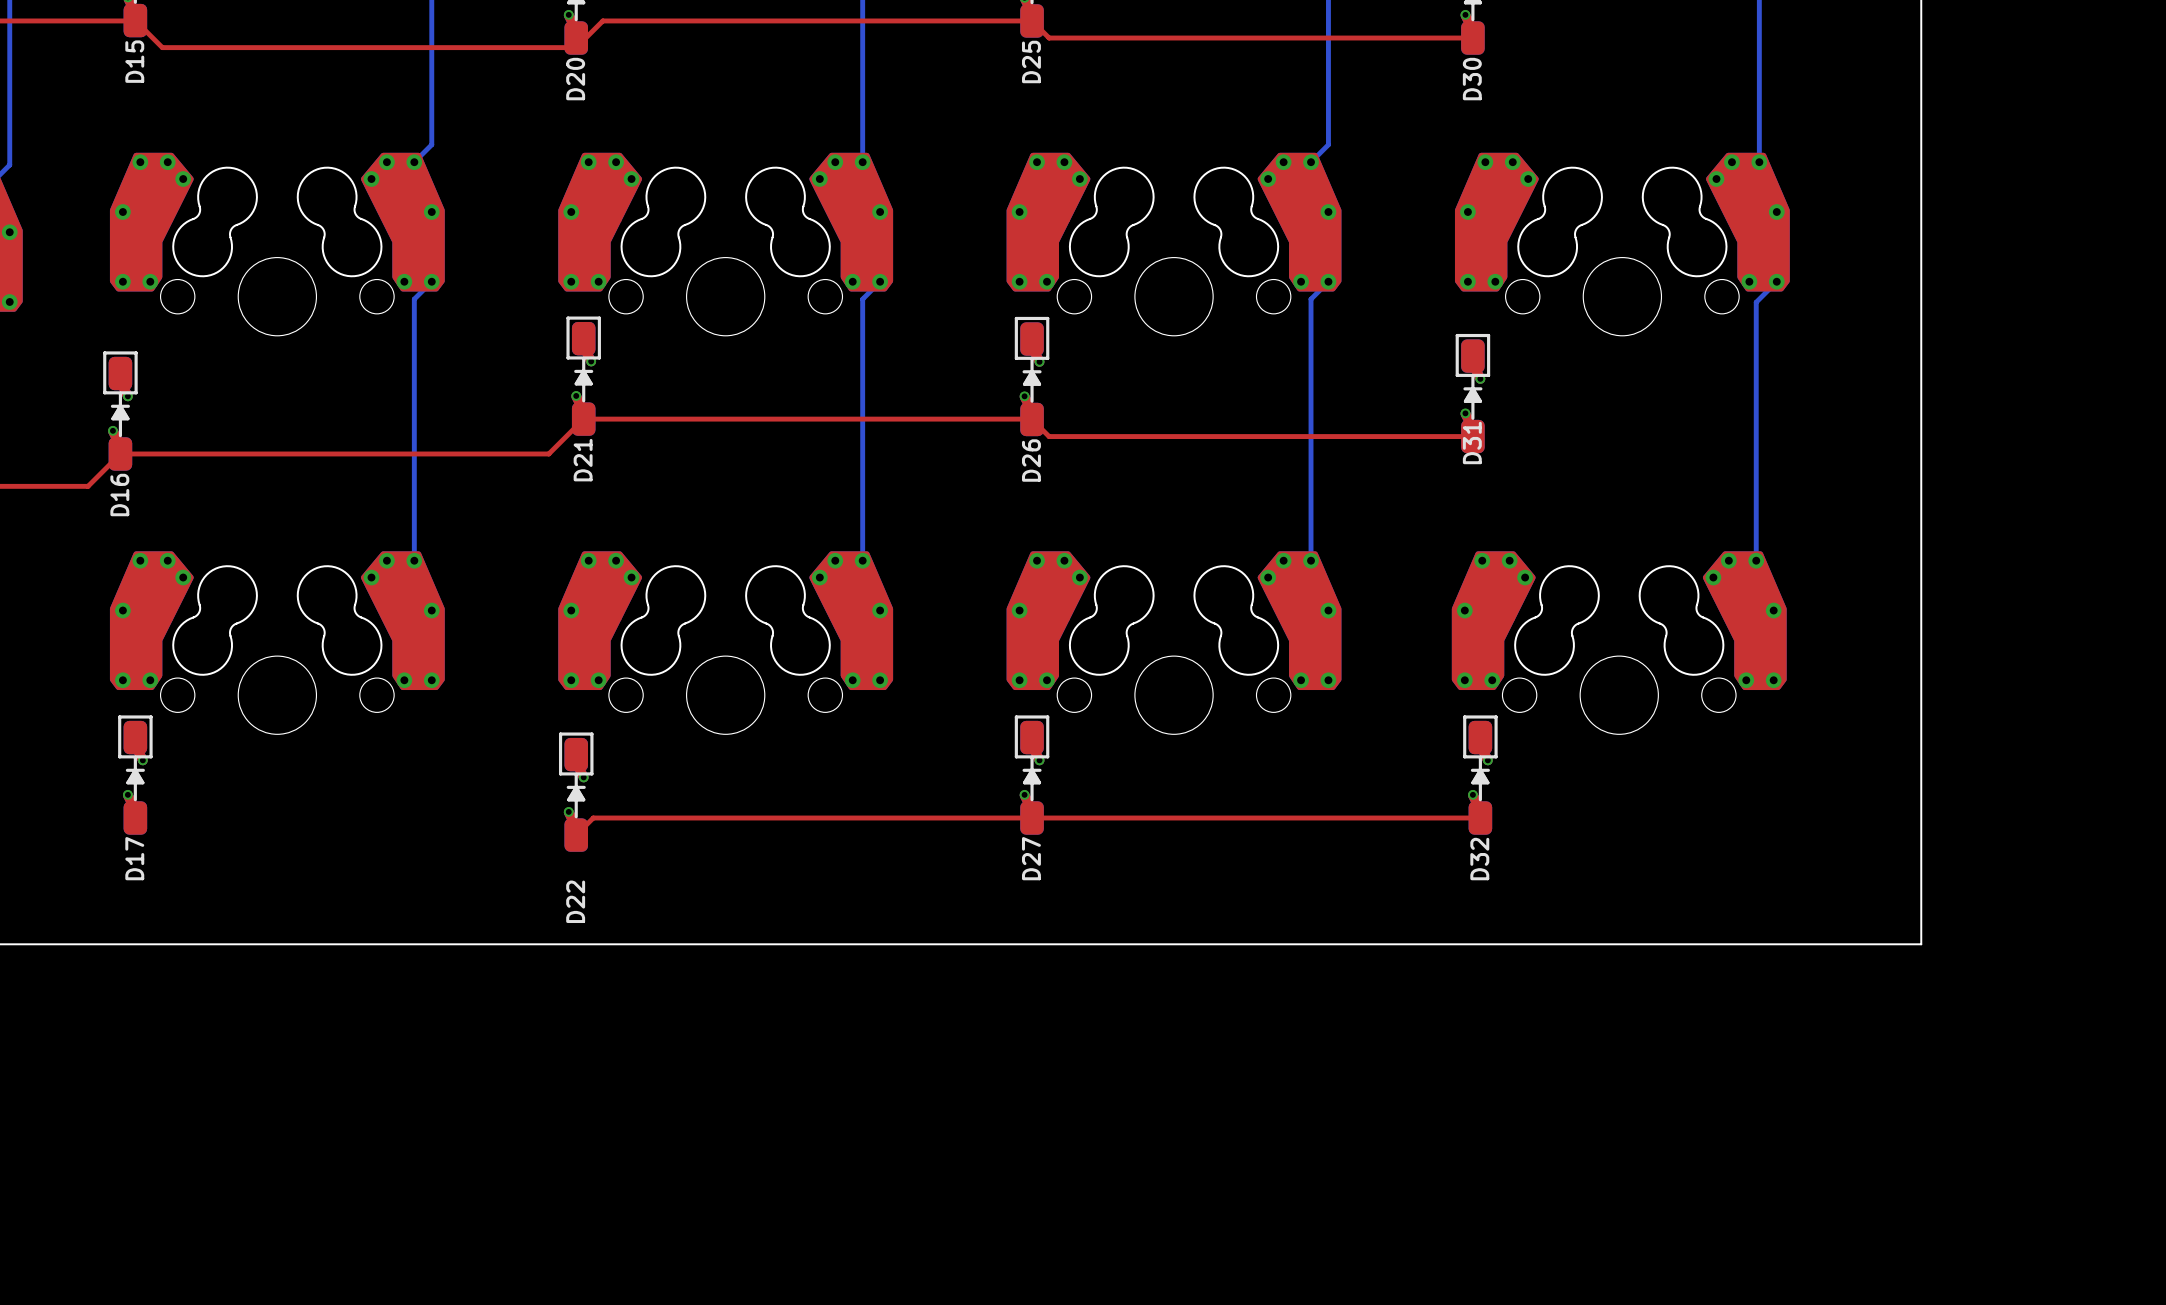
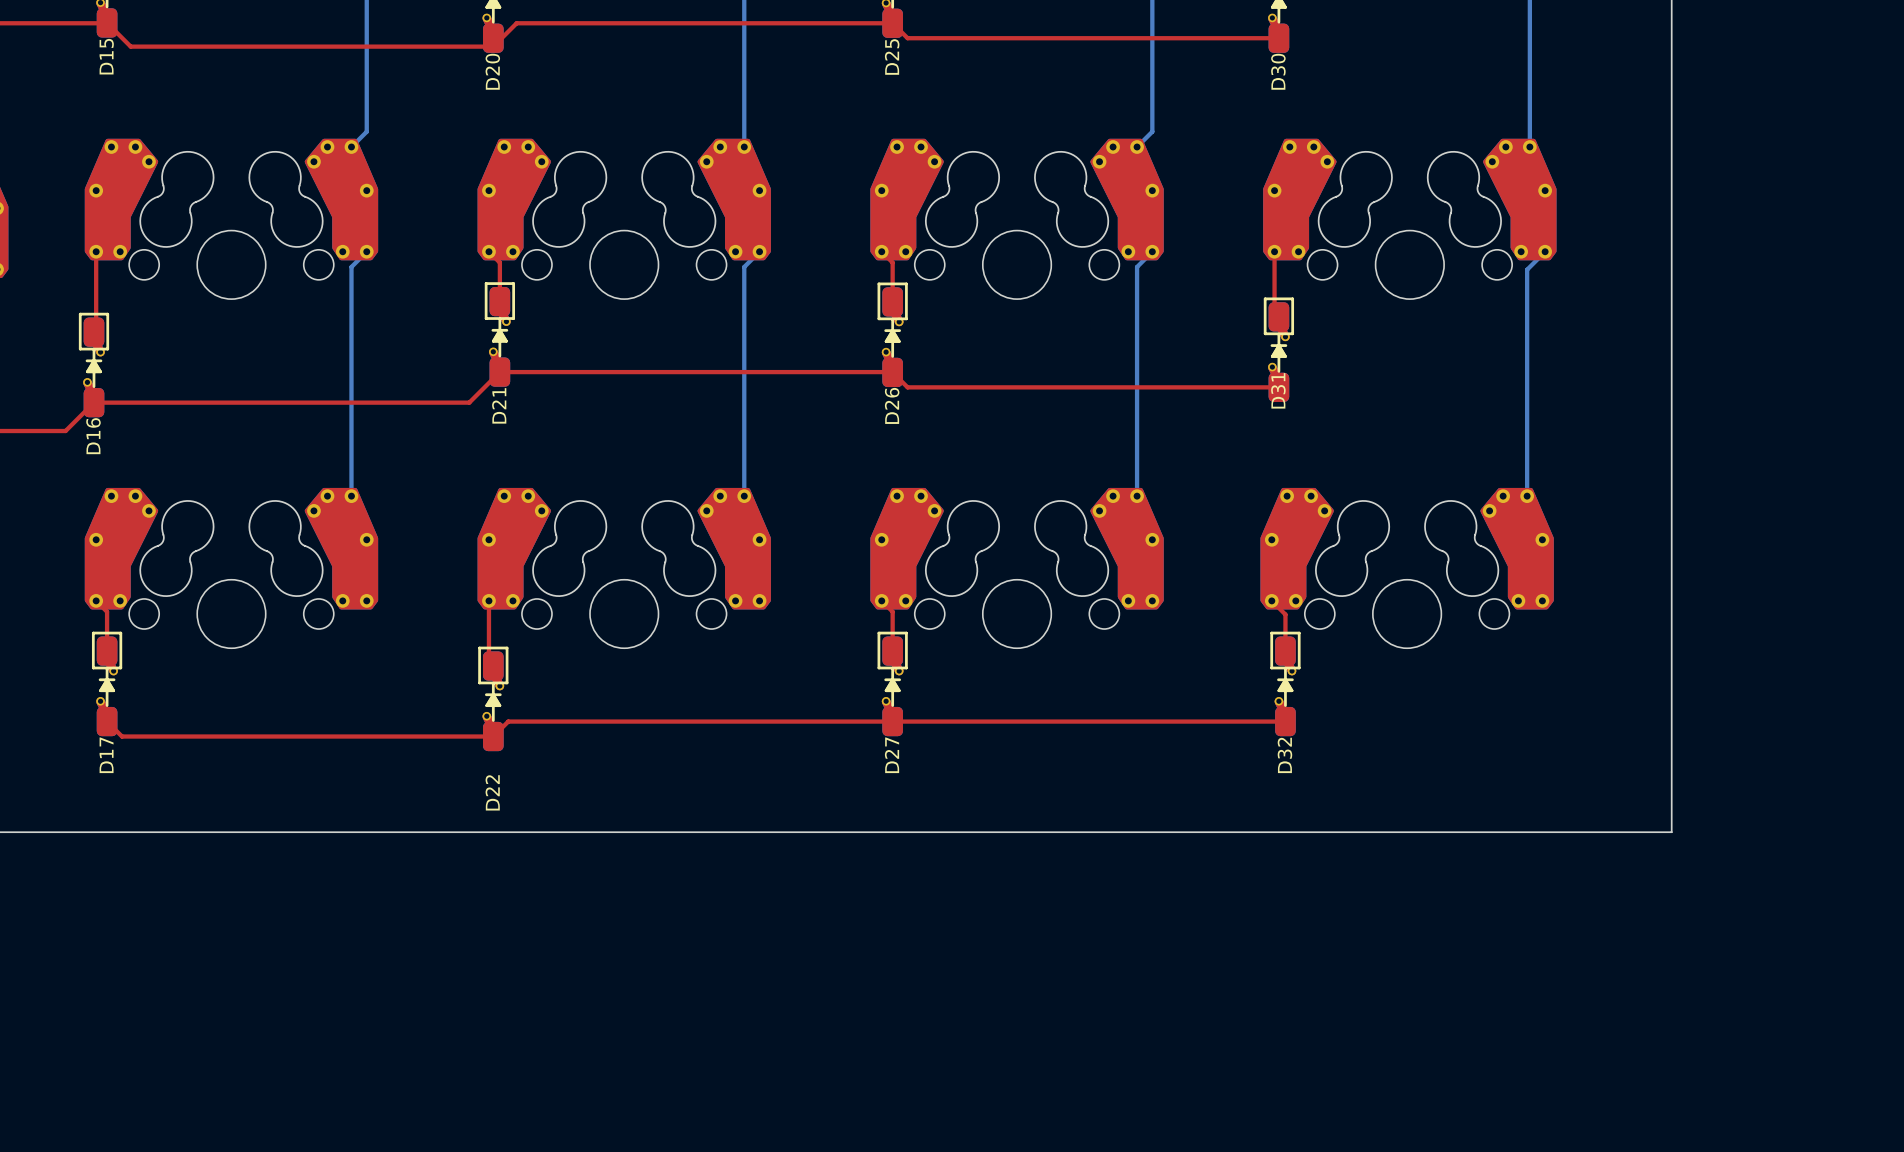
top track: none -> (96, 251) (96, 329) (93, 332)
top track: none -> (488, 251) (499, 262) (499, 301)
top track: none -> (881, 251) (892, 262) (892, 301)
top track: none -> (1274, 251) (1274, 312) (1278, 316)
top track: none -> (96, 600) (107, 611) (107, 651)
top track: none -> (488, 600) (488, 661) (493, 666)
top track: none -> (881, 600) (892, 611) (892, 651)
top track: none -> (1271, 600) (1285, 614) (1285, 651)
top track: none -> (107, 721) (122, 736) (493, 736)

